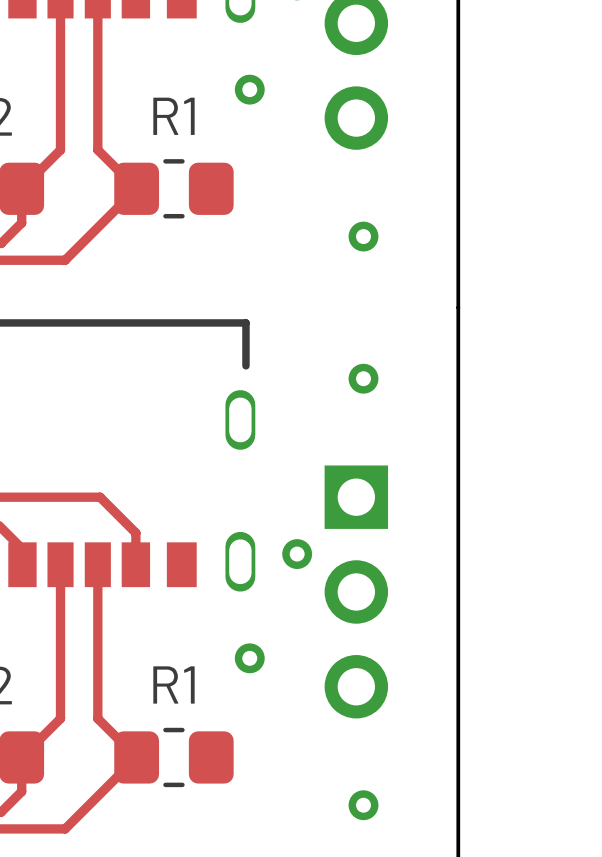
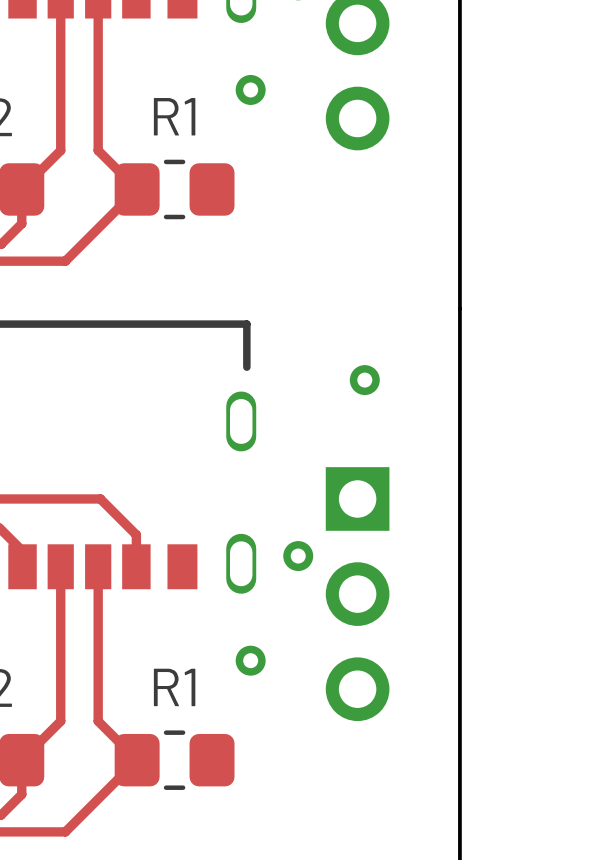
via: (363, 236) -> none
via: (363, 805) -> none

